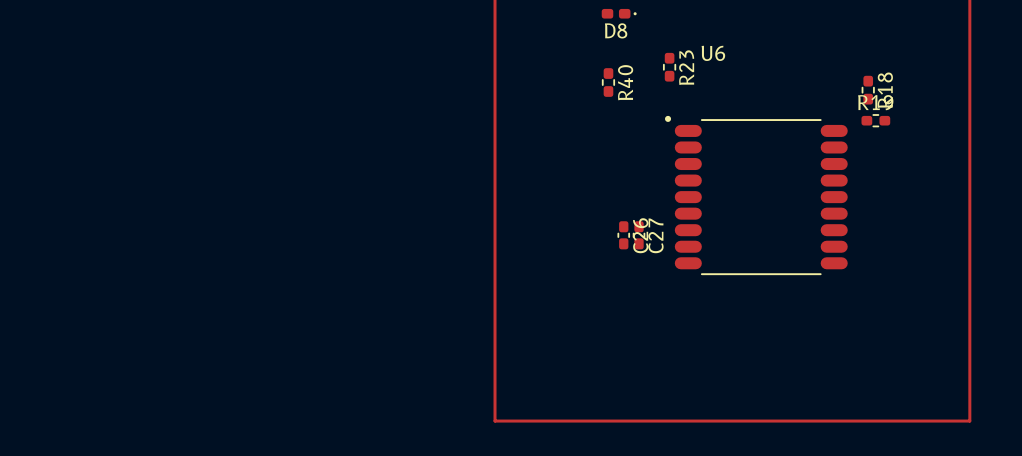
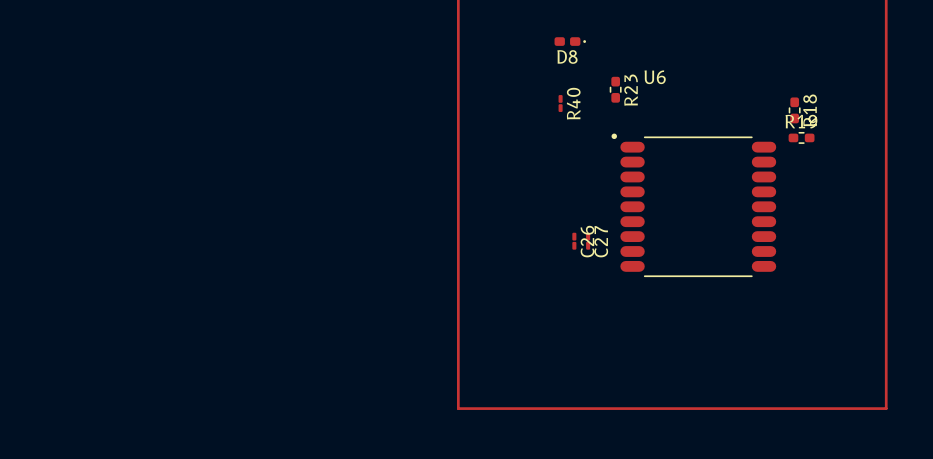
R40 footprint: [601, 68, 616, 97] -> [558, 95, 563, 112]
C26 footprint: [617, 221, 631, 250] -> [572, 232, 577, 250]
C27 footprint: [632, 221, 646, 250] -> [586, 232, 591, 250]

